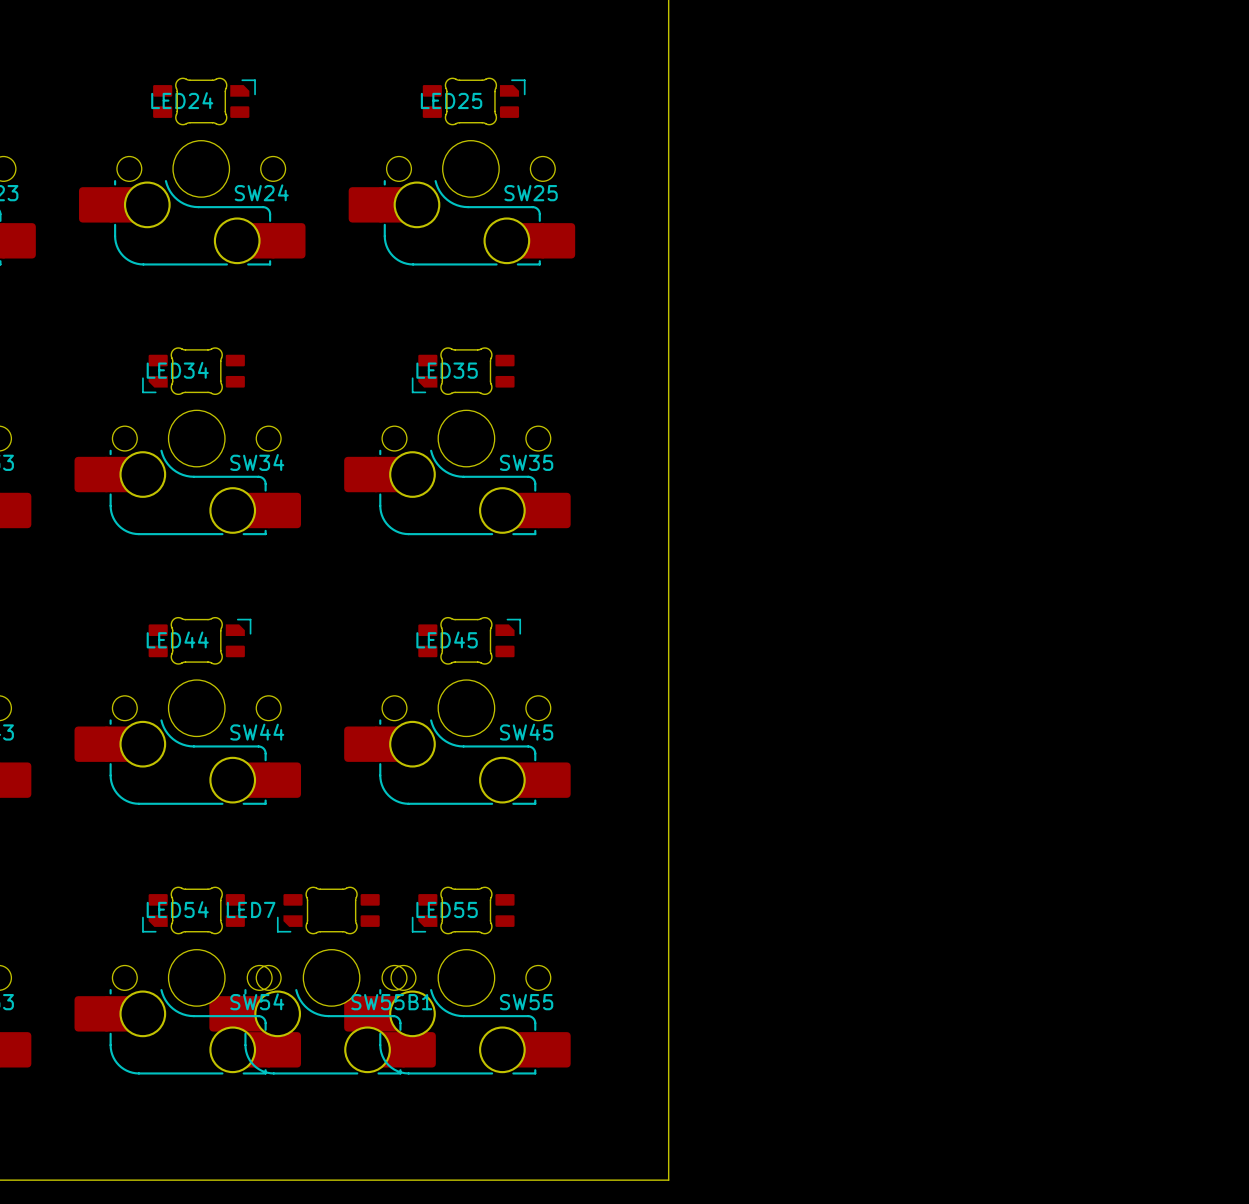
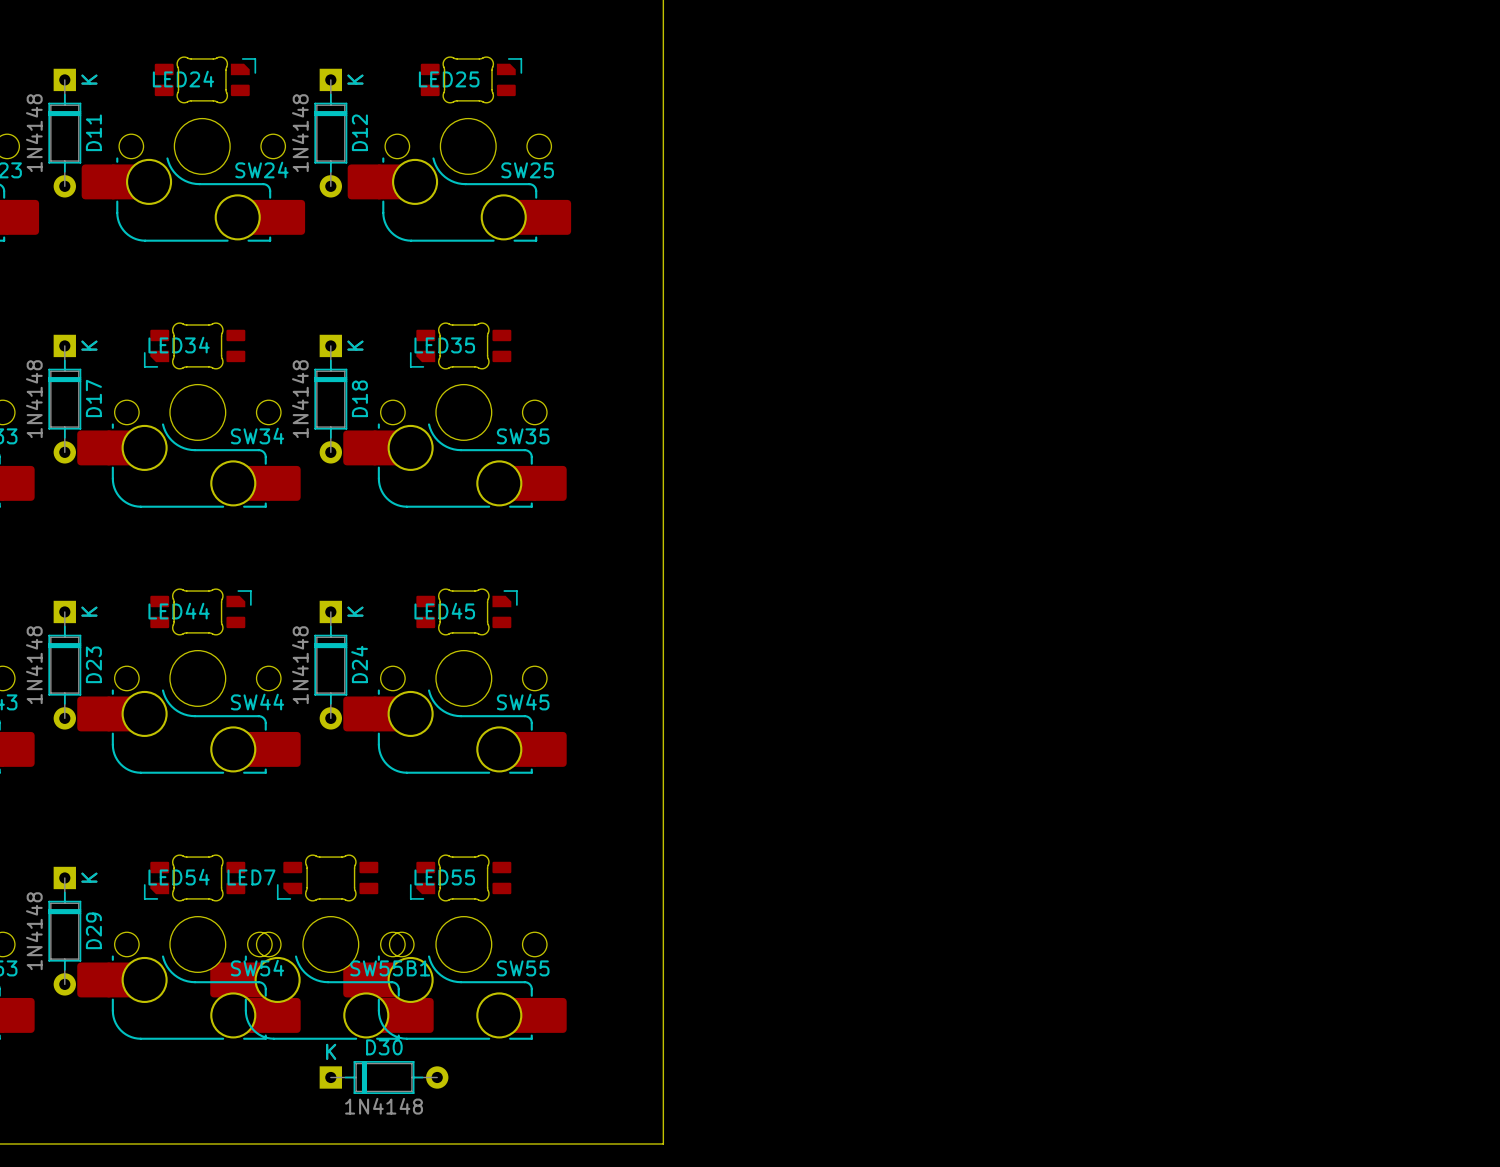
D11: none -> 1N4148 (64, 133)
D12: none -> 1N4148 (330, 133)
D17: none -> 1N4148 (64, 399)
D18: none -> 1N4148 (330, 399)
D23: none -> 1N4148 (64, 665)
D24: none -> 1N4148 (330, 665)
D29: none -> 1N4148 (64, 931)
D30: none -> 1N4148 (384, 1077)

